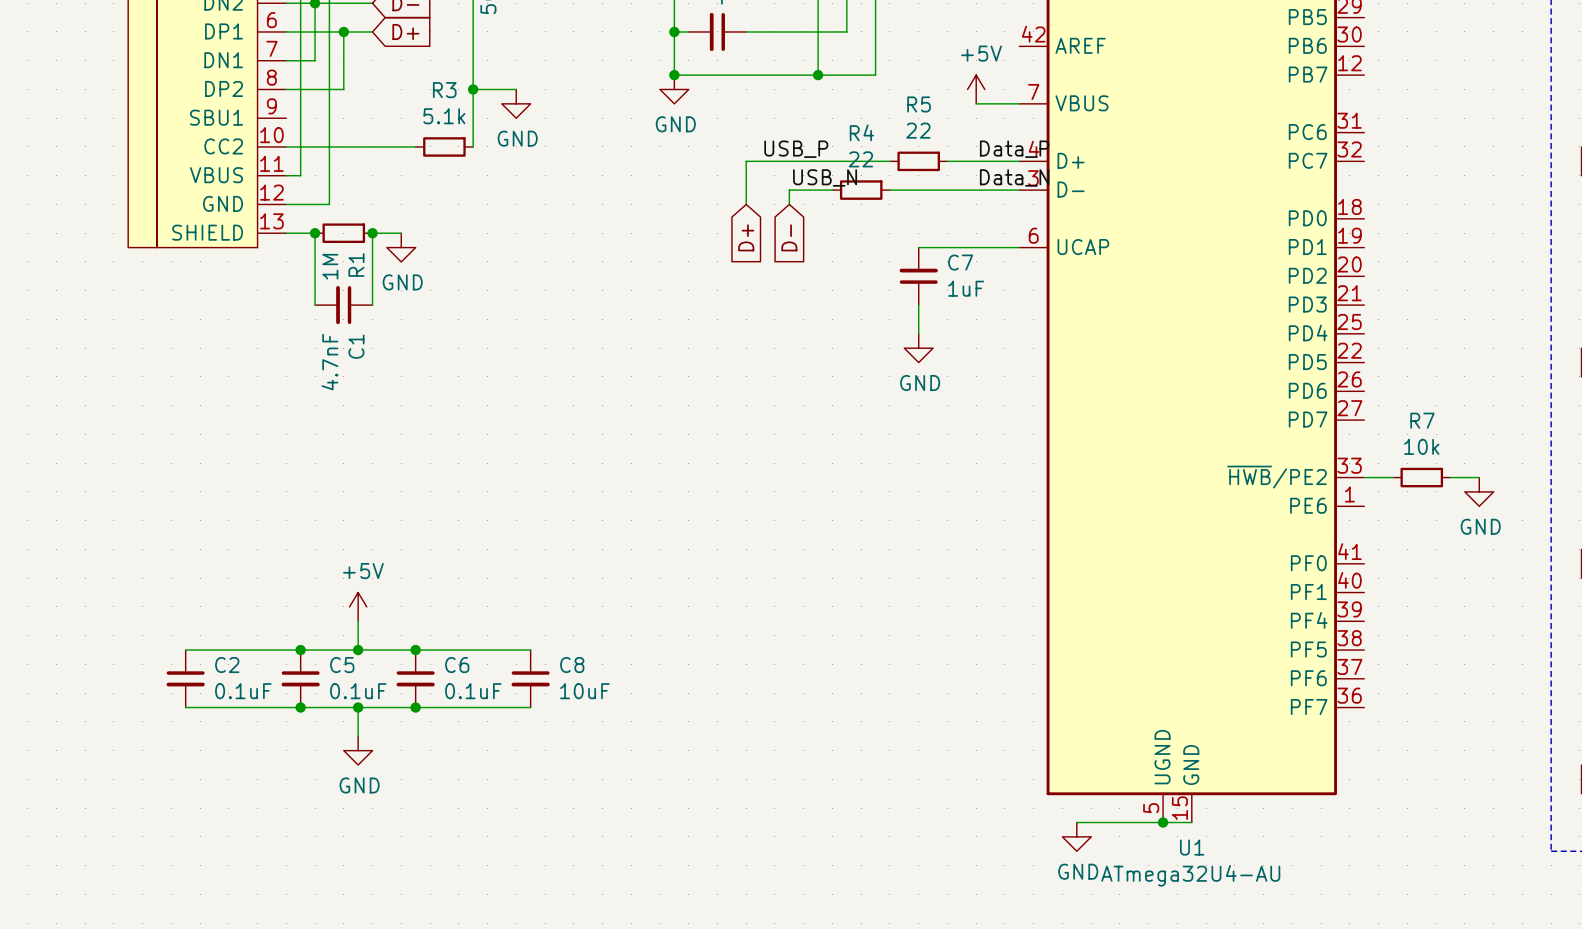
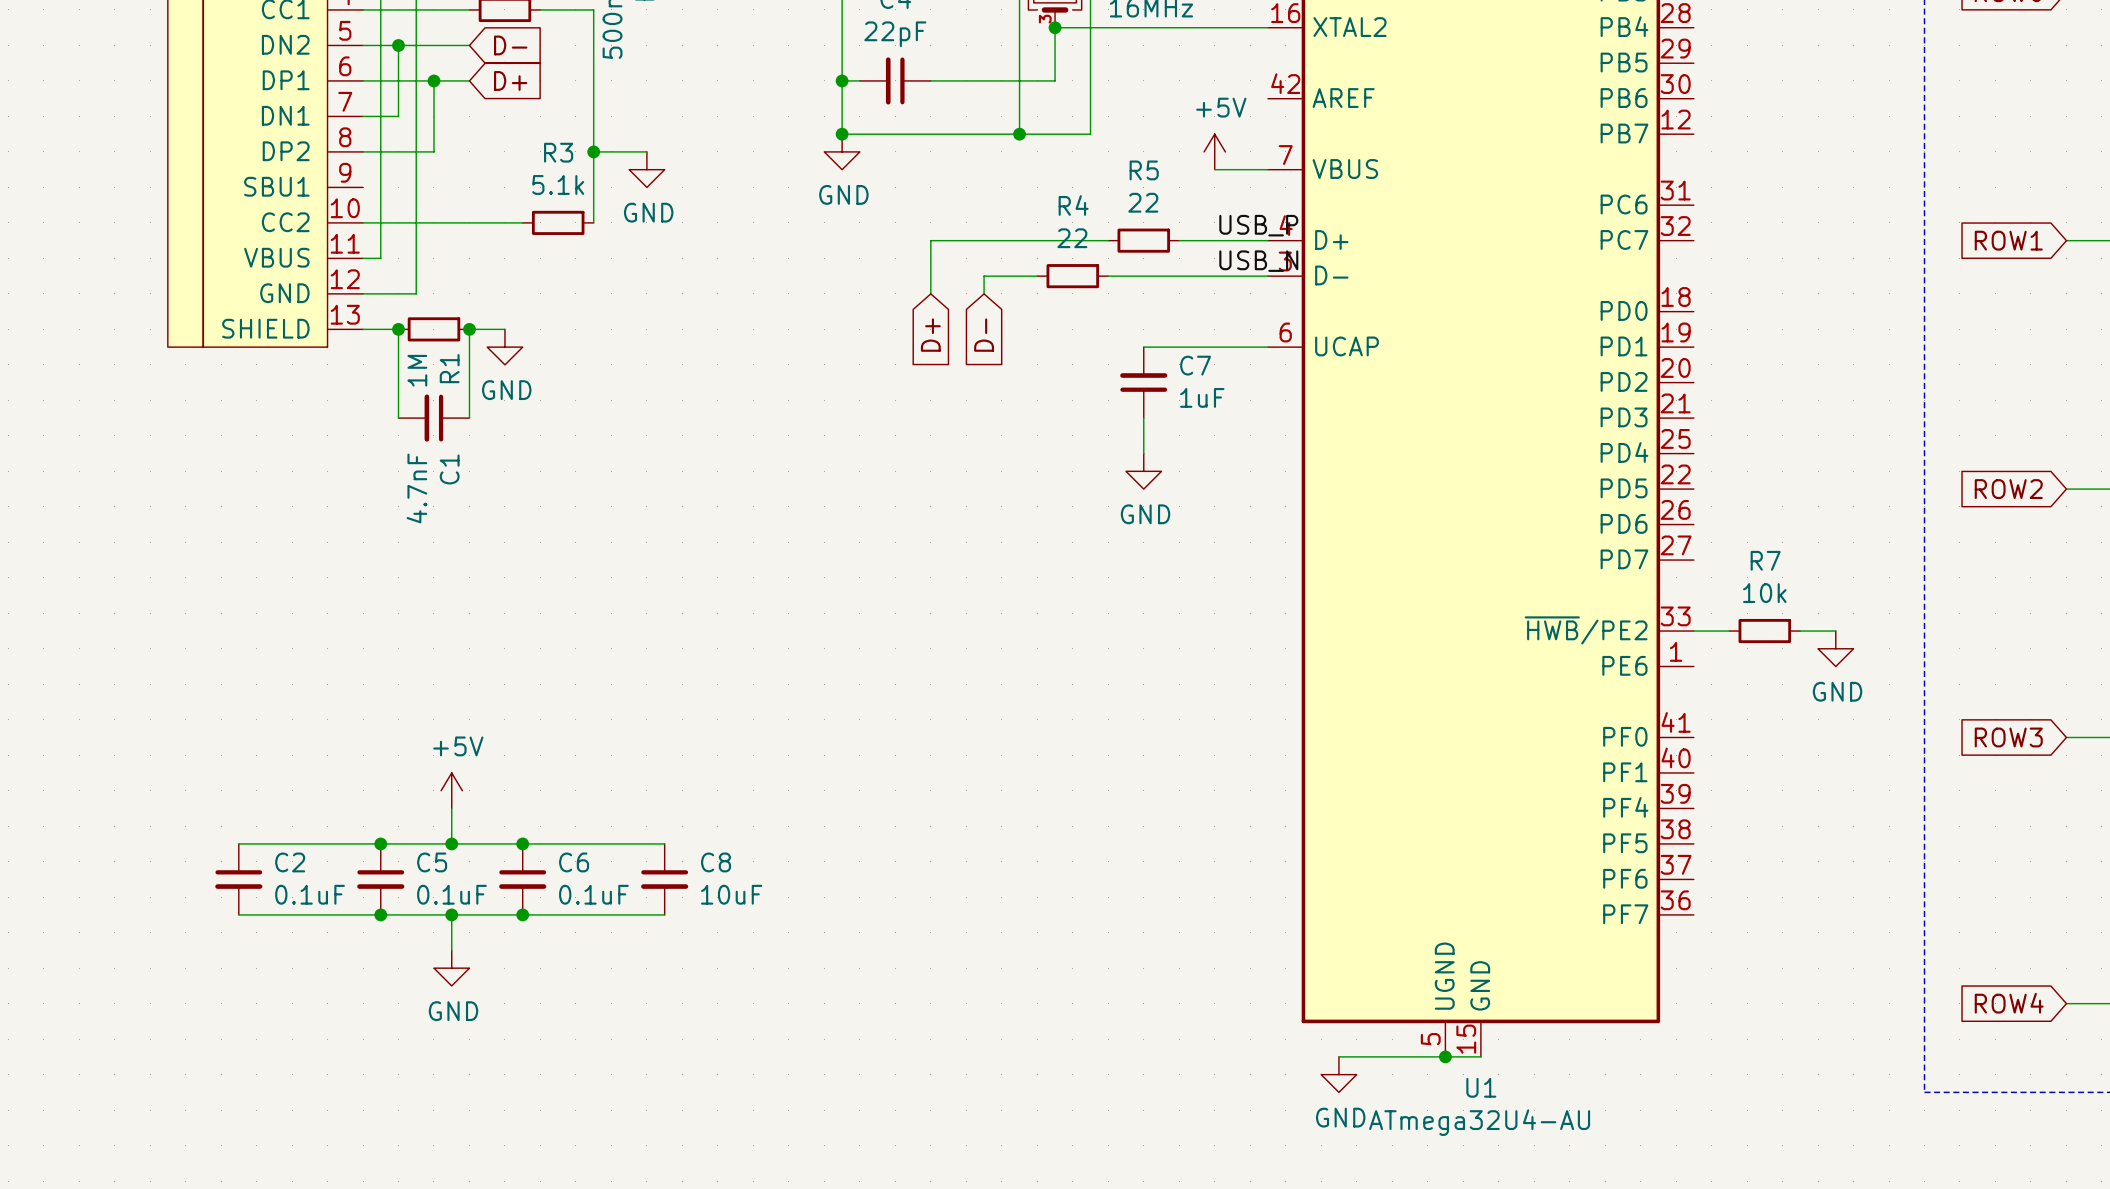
label: USB_P (796, 149) -> none
label: Data_P (1014, 149) -> USB_P (1258, 225)
label: USB_N (825, 177) -> none
label: Data_N (1014, 177) -> USB_N (1258, 261)

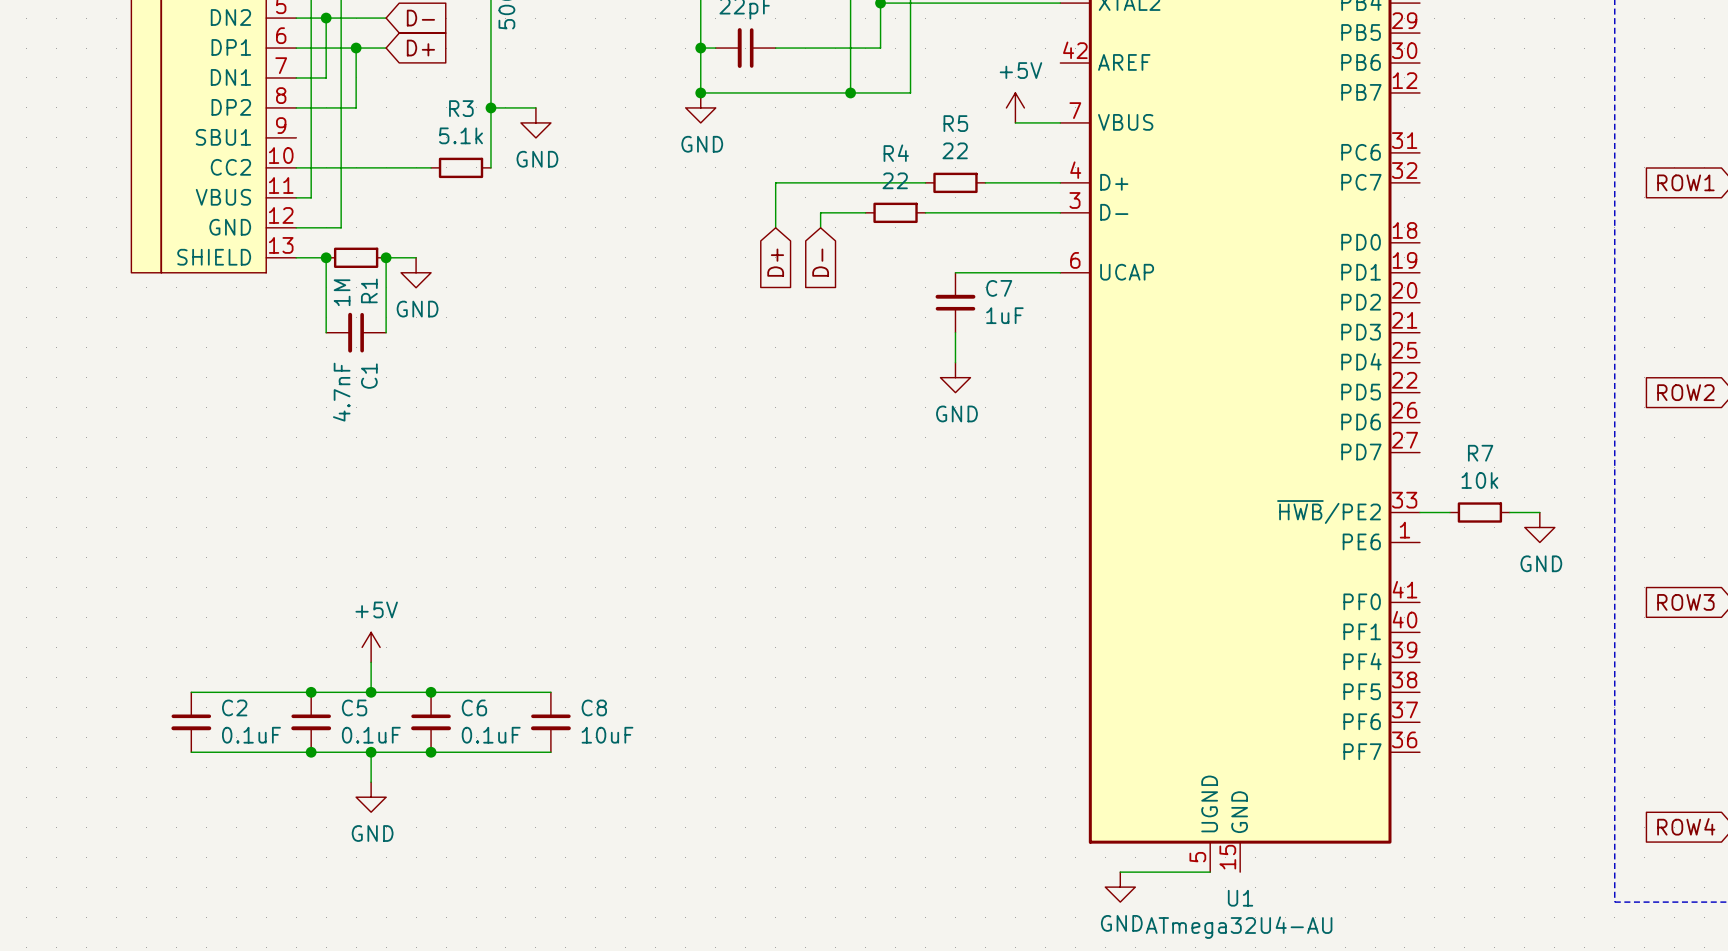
label: USB_P (1258, 225) -> none
label: USB_N (1258, 261) -> none
wire: (1445, 1056) (1480, 1056) -> none
junction: (1445, 1056) -> none

